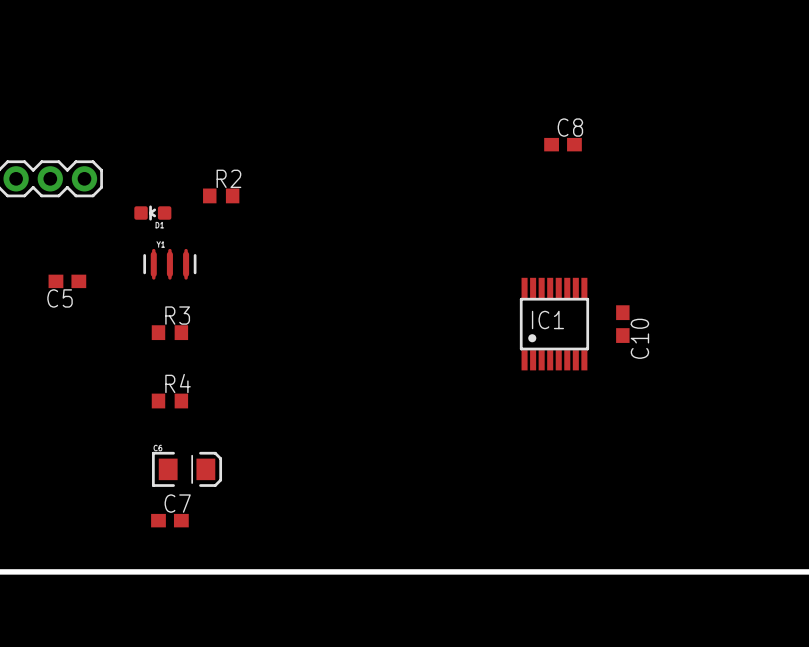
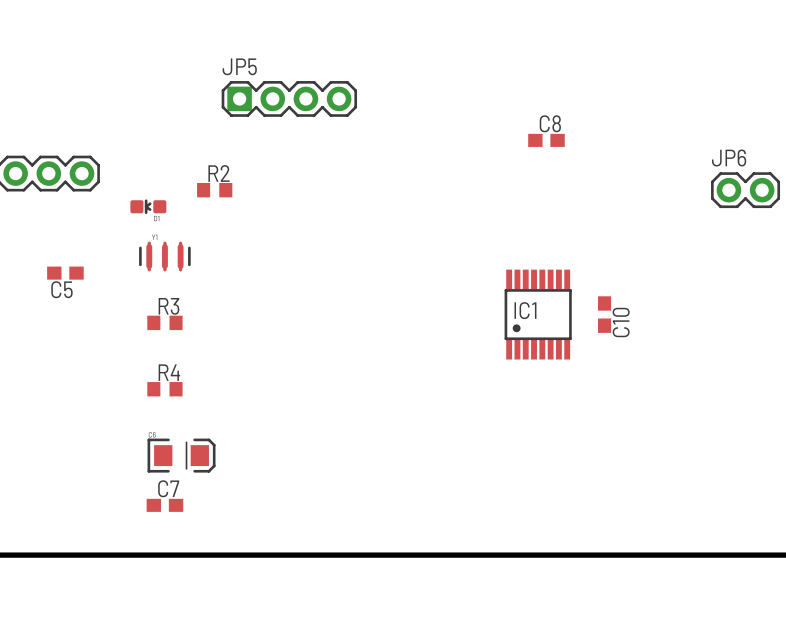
JP5: none -> (289, 98)
JP6: none -> (745, 190)

